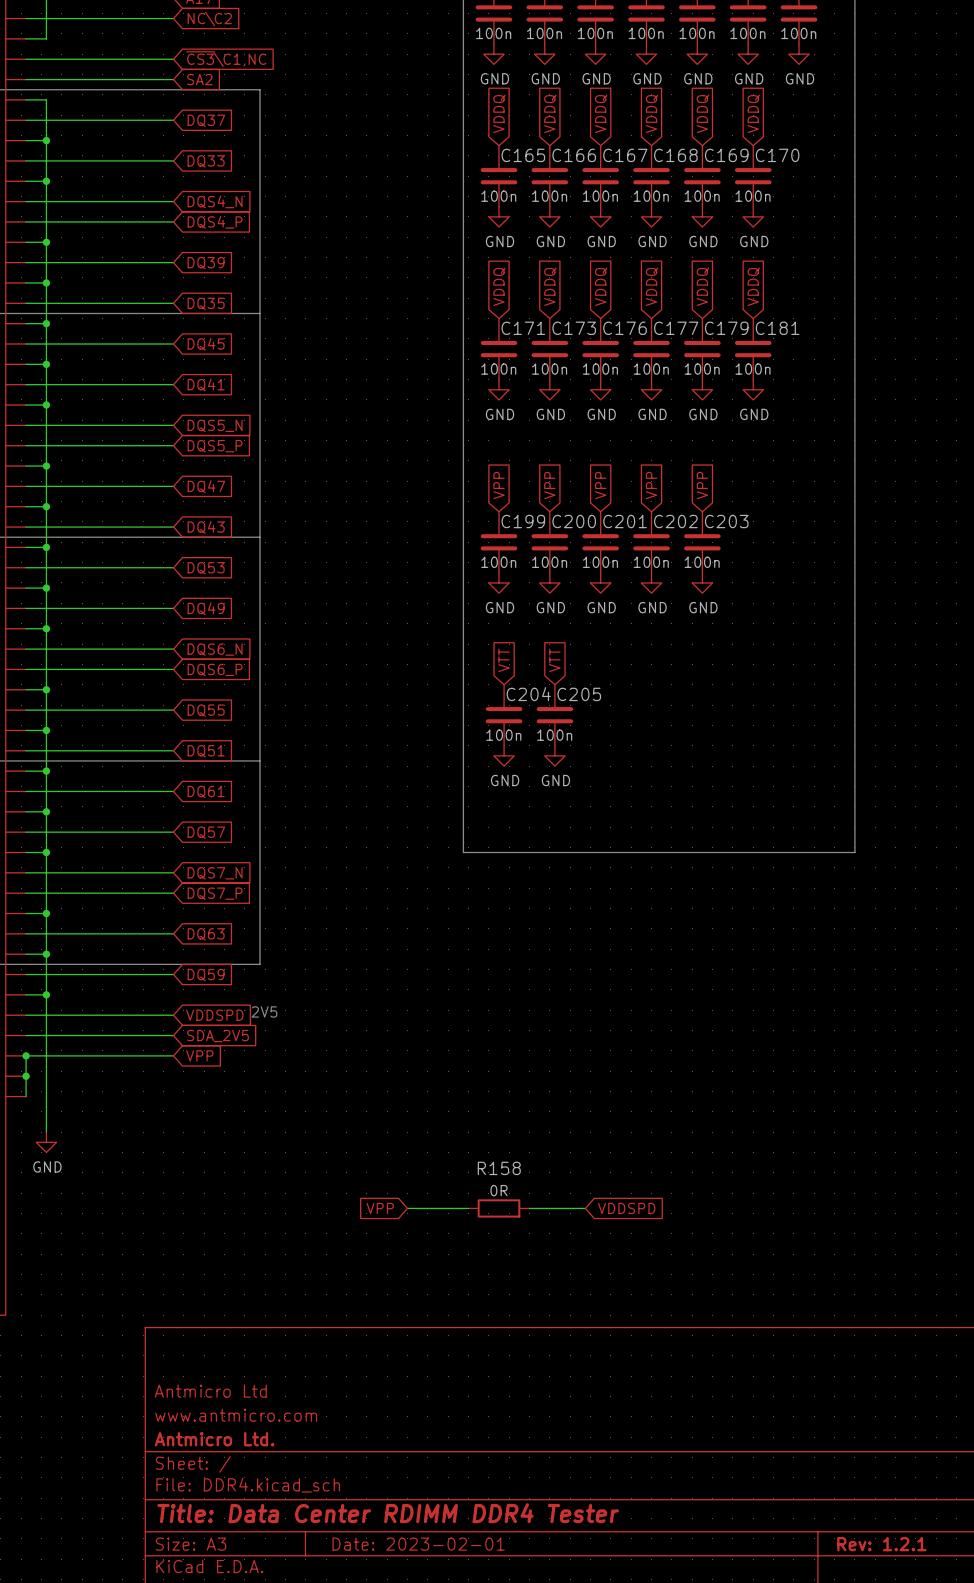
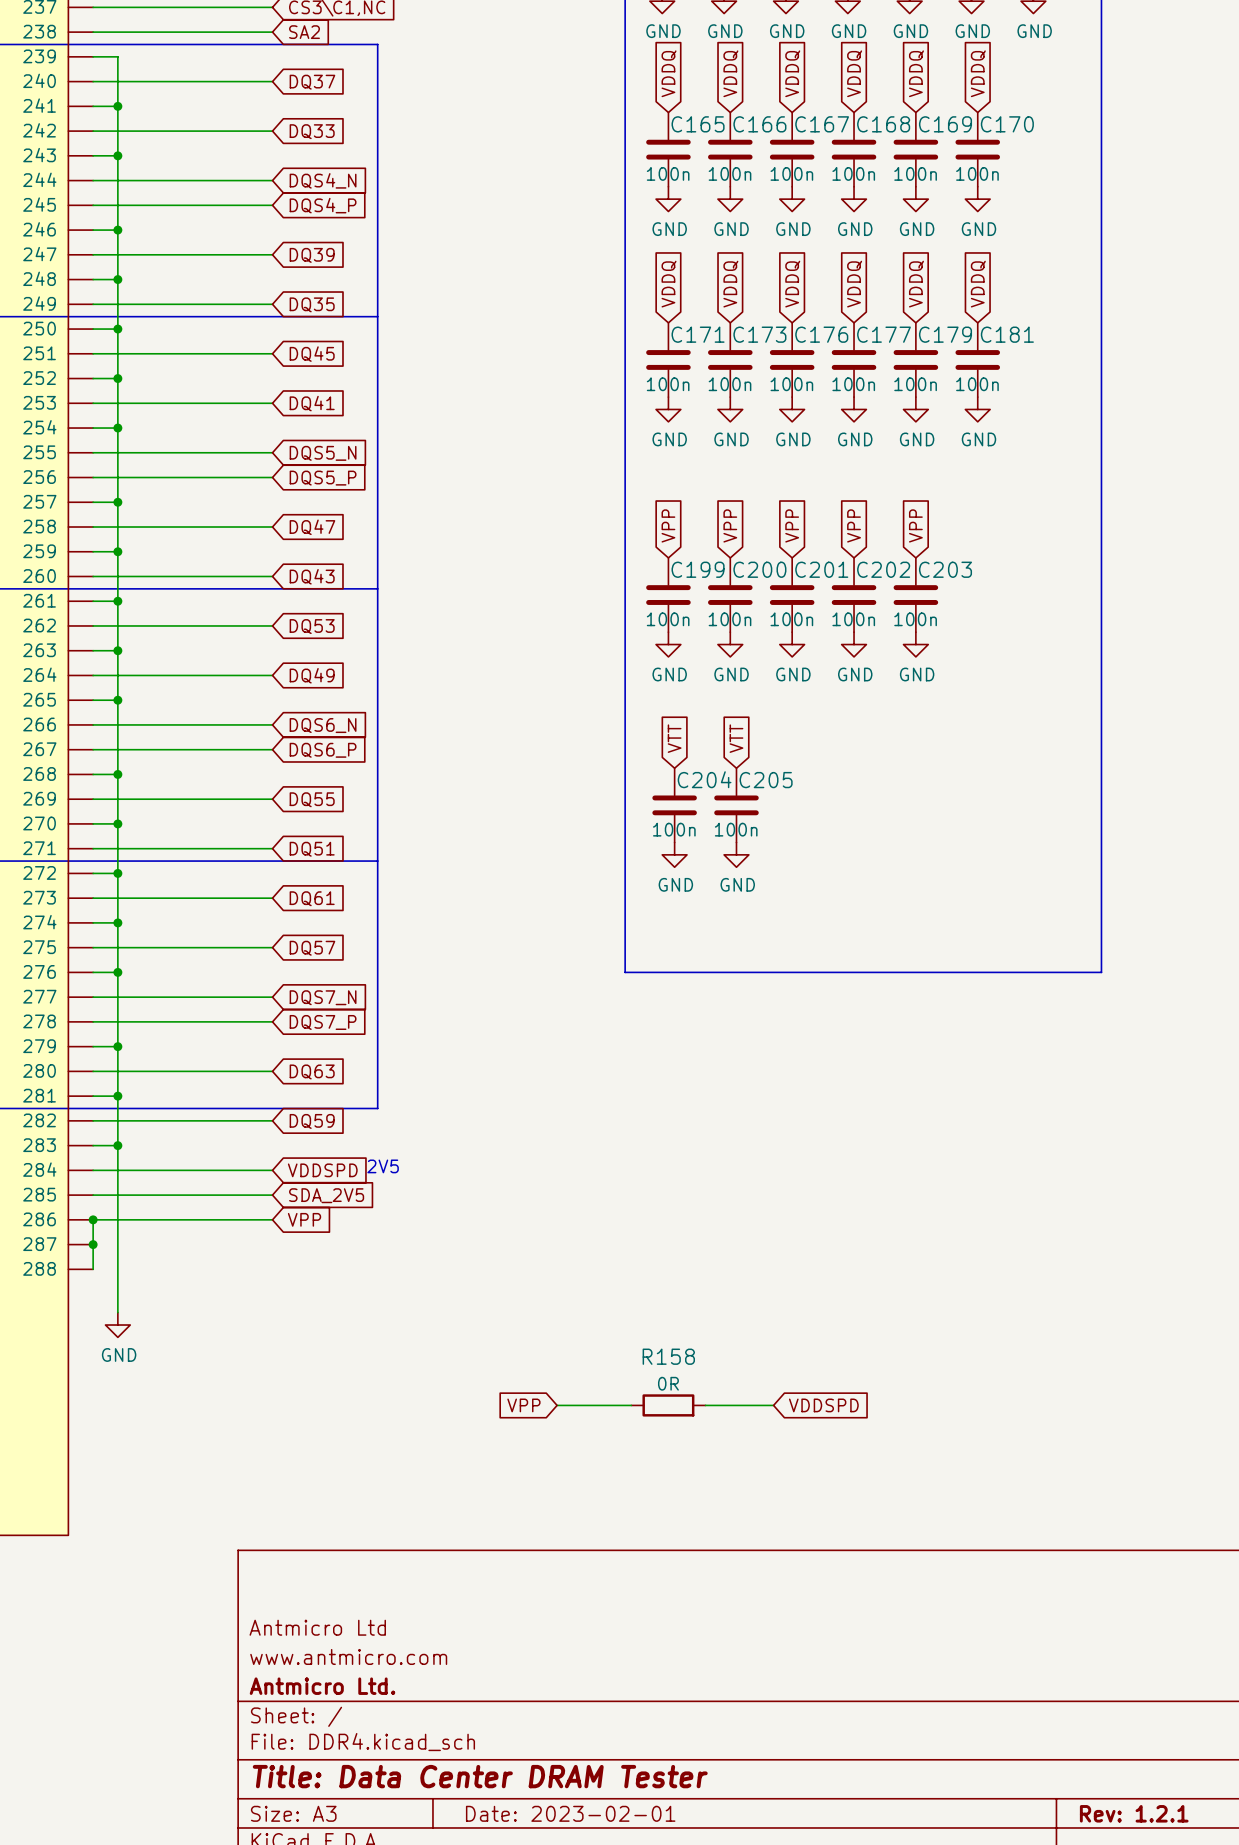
title block: Title: Data Center RDIMM DDR4 Tester (388, 1513) -> Title: Data Center DRAM Tester (480, 1776)

